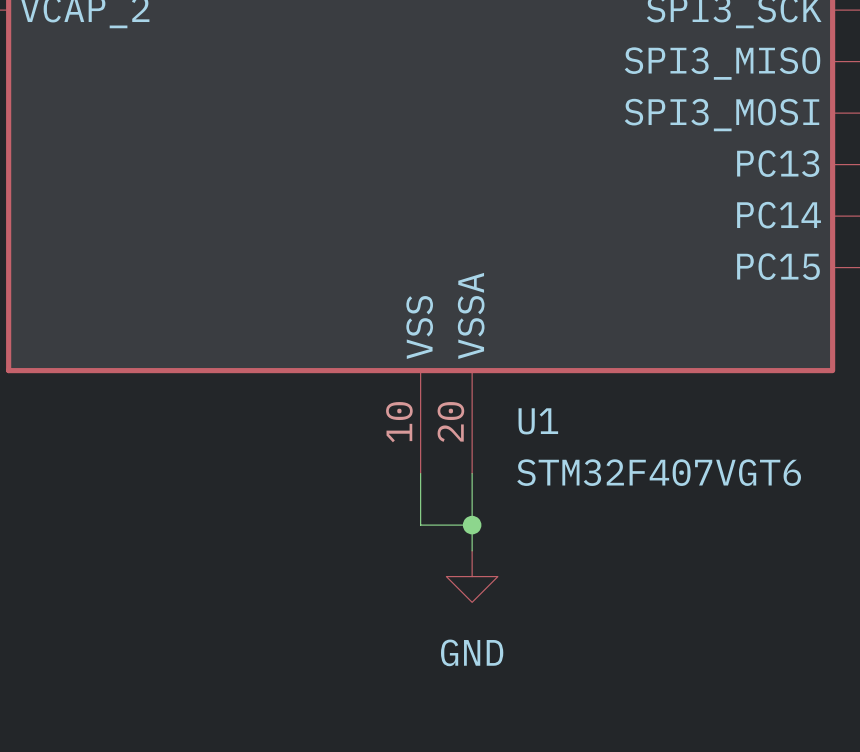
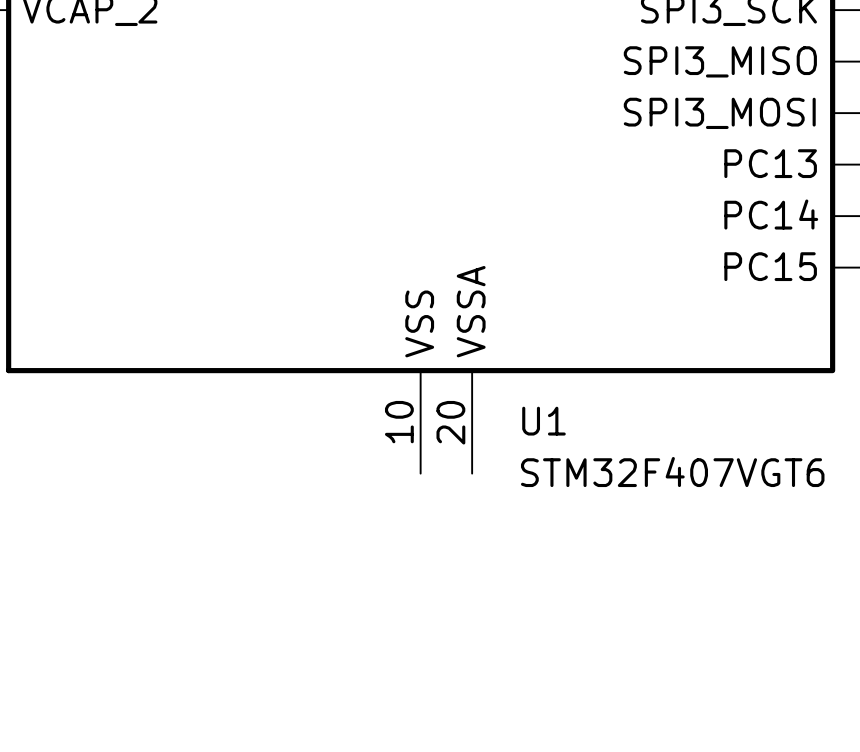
wire: (420, 473) (420, 525) (472, 525) -> none
wire: (472, 473) (472, 550) -> none
junction: (472, 525) -> none
power symbol: GND (472, 576) -> none

